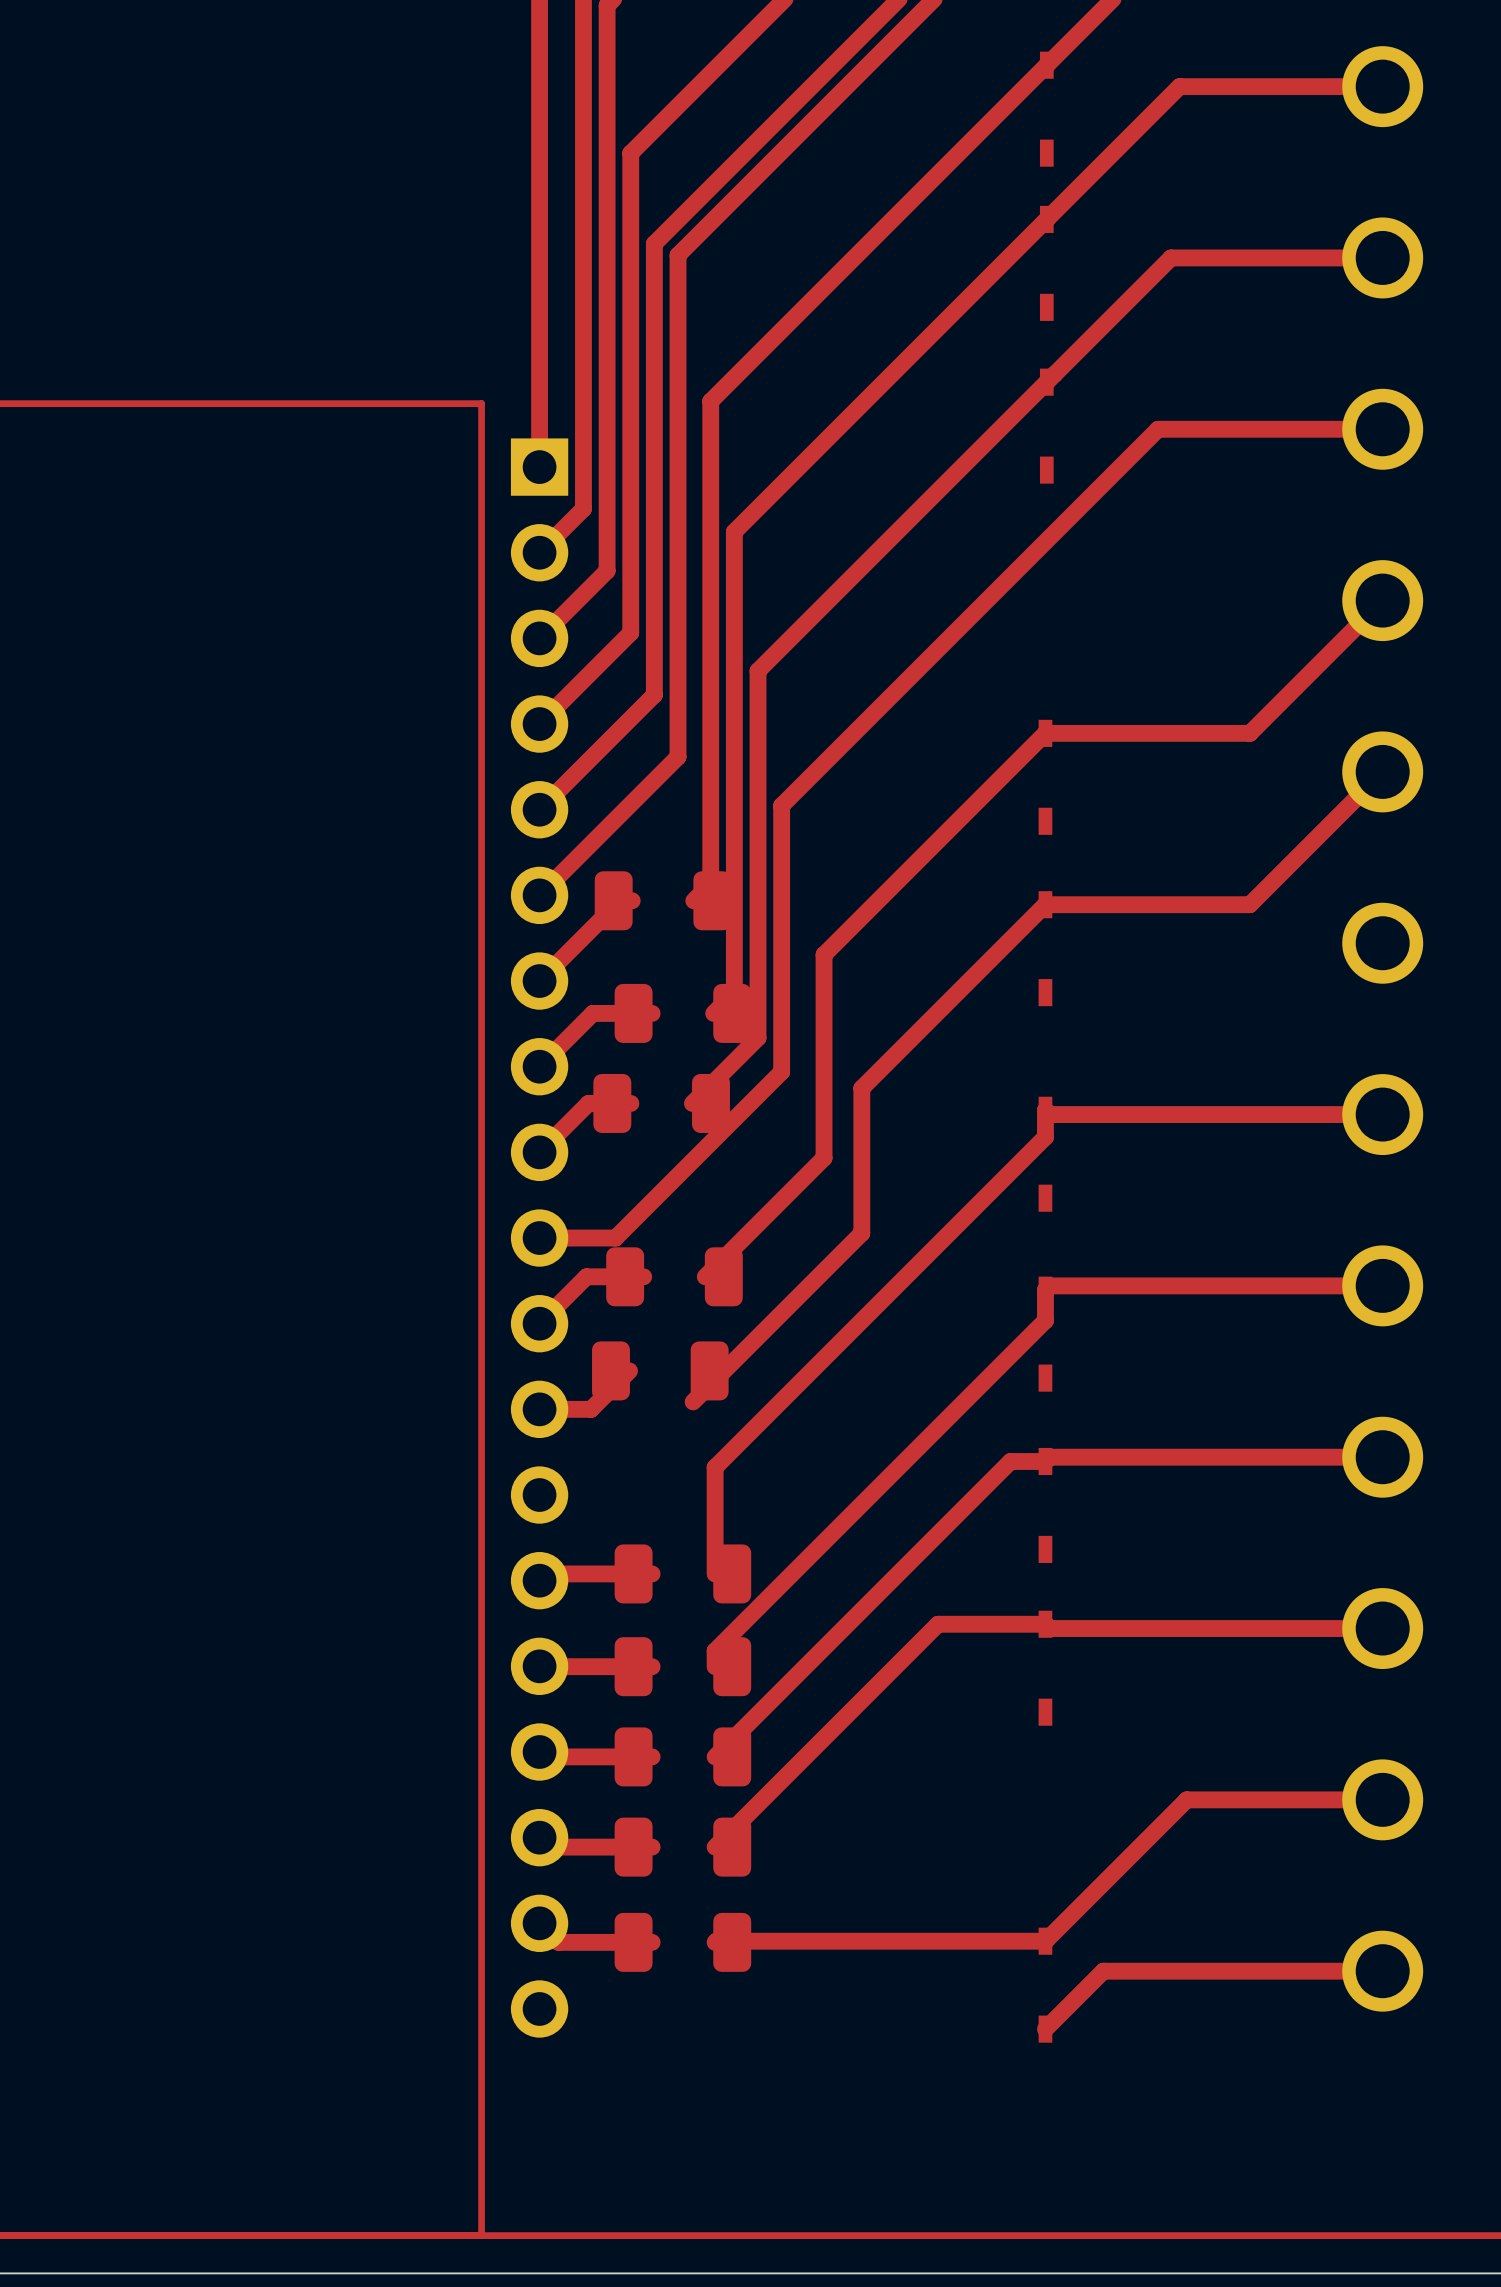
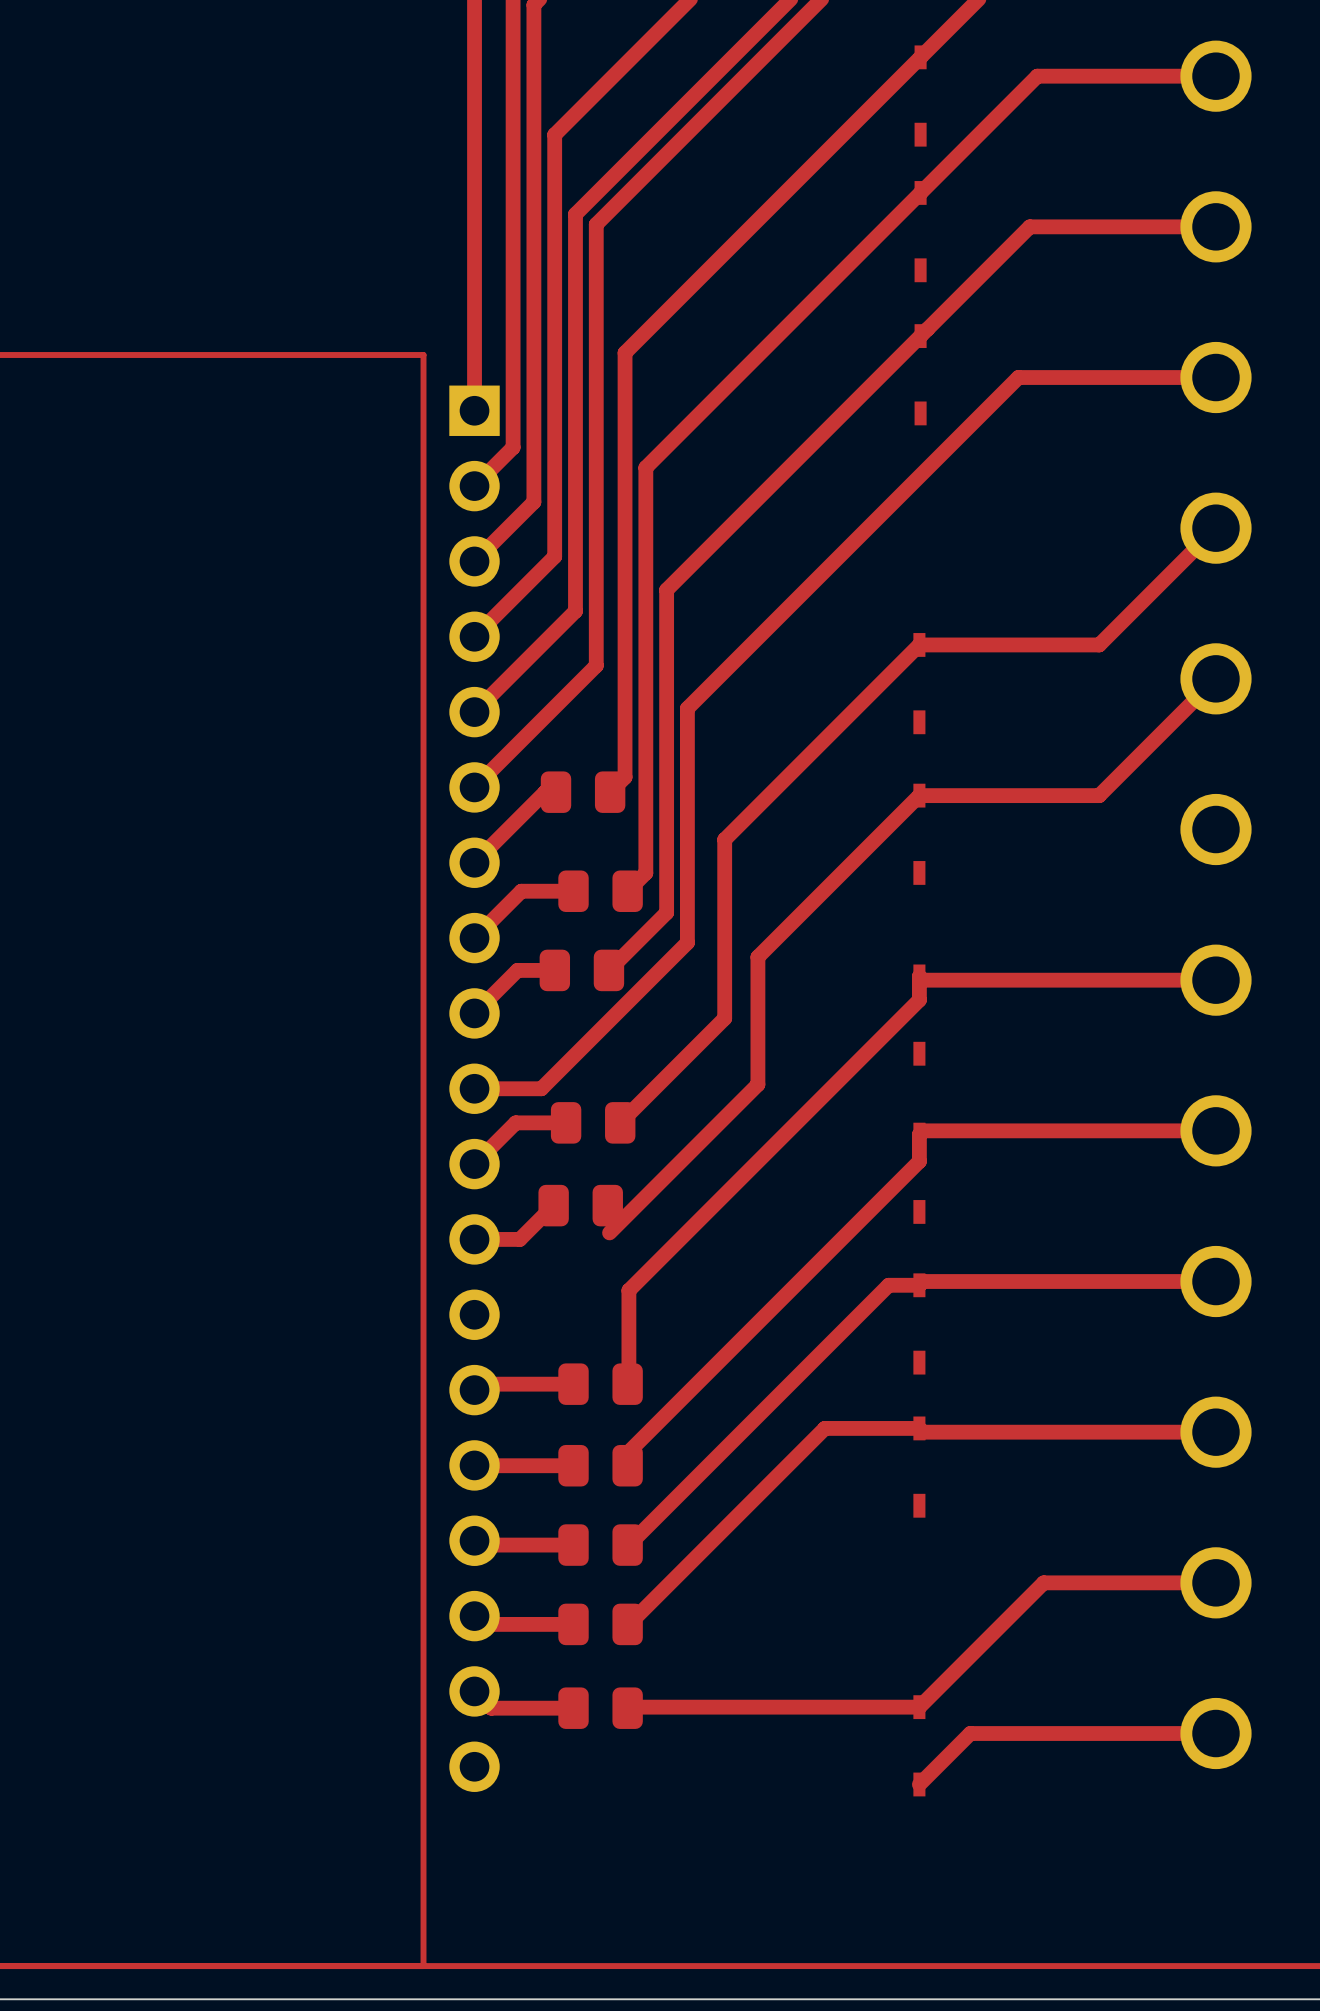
part footprint: [594, 871, 732, 931] -> [540, 771, 626, 813]
part footprint: [614, 983, 752, 1043] -> [558, 870, 643, 913]
part footprint: [593, 1073, 730, 1133] -> [539, 949, 625, 992]
part footprint: [606, 1247, 743, 1307] -> [550, 1102, 636, 1144]
part footprint: [592, 1341, 729, 1401] -> [538, 1184, 623, 1227]
part footprint: [614, 1544, 752, 1604] -> [558, 1363, 643, 1405]
part footprint: [614, 1637, 752, 1697] -> [558, 1444, 643, 1487]
part footprint: [614, 1727, 752, 1787] -> [558, 1524, 643, 1566]
part footprint: [614, 1817, 752, 1877] -> [558, 1603, 643, 1646]
part footprint: [614, 1912, 752, 1972] -> [558, 1687, 643, 1729]

